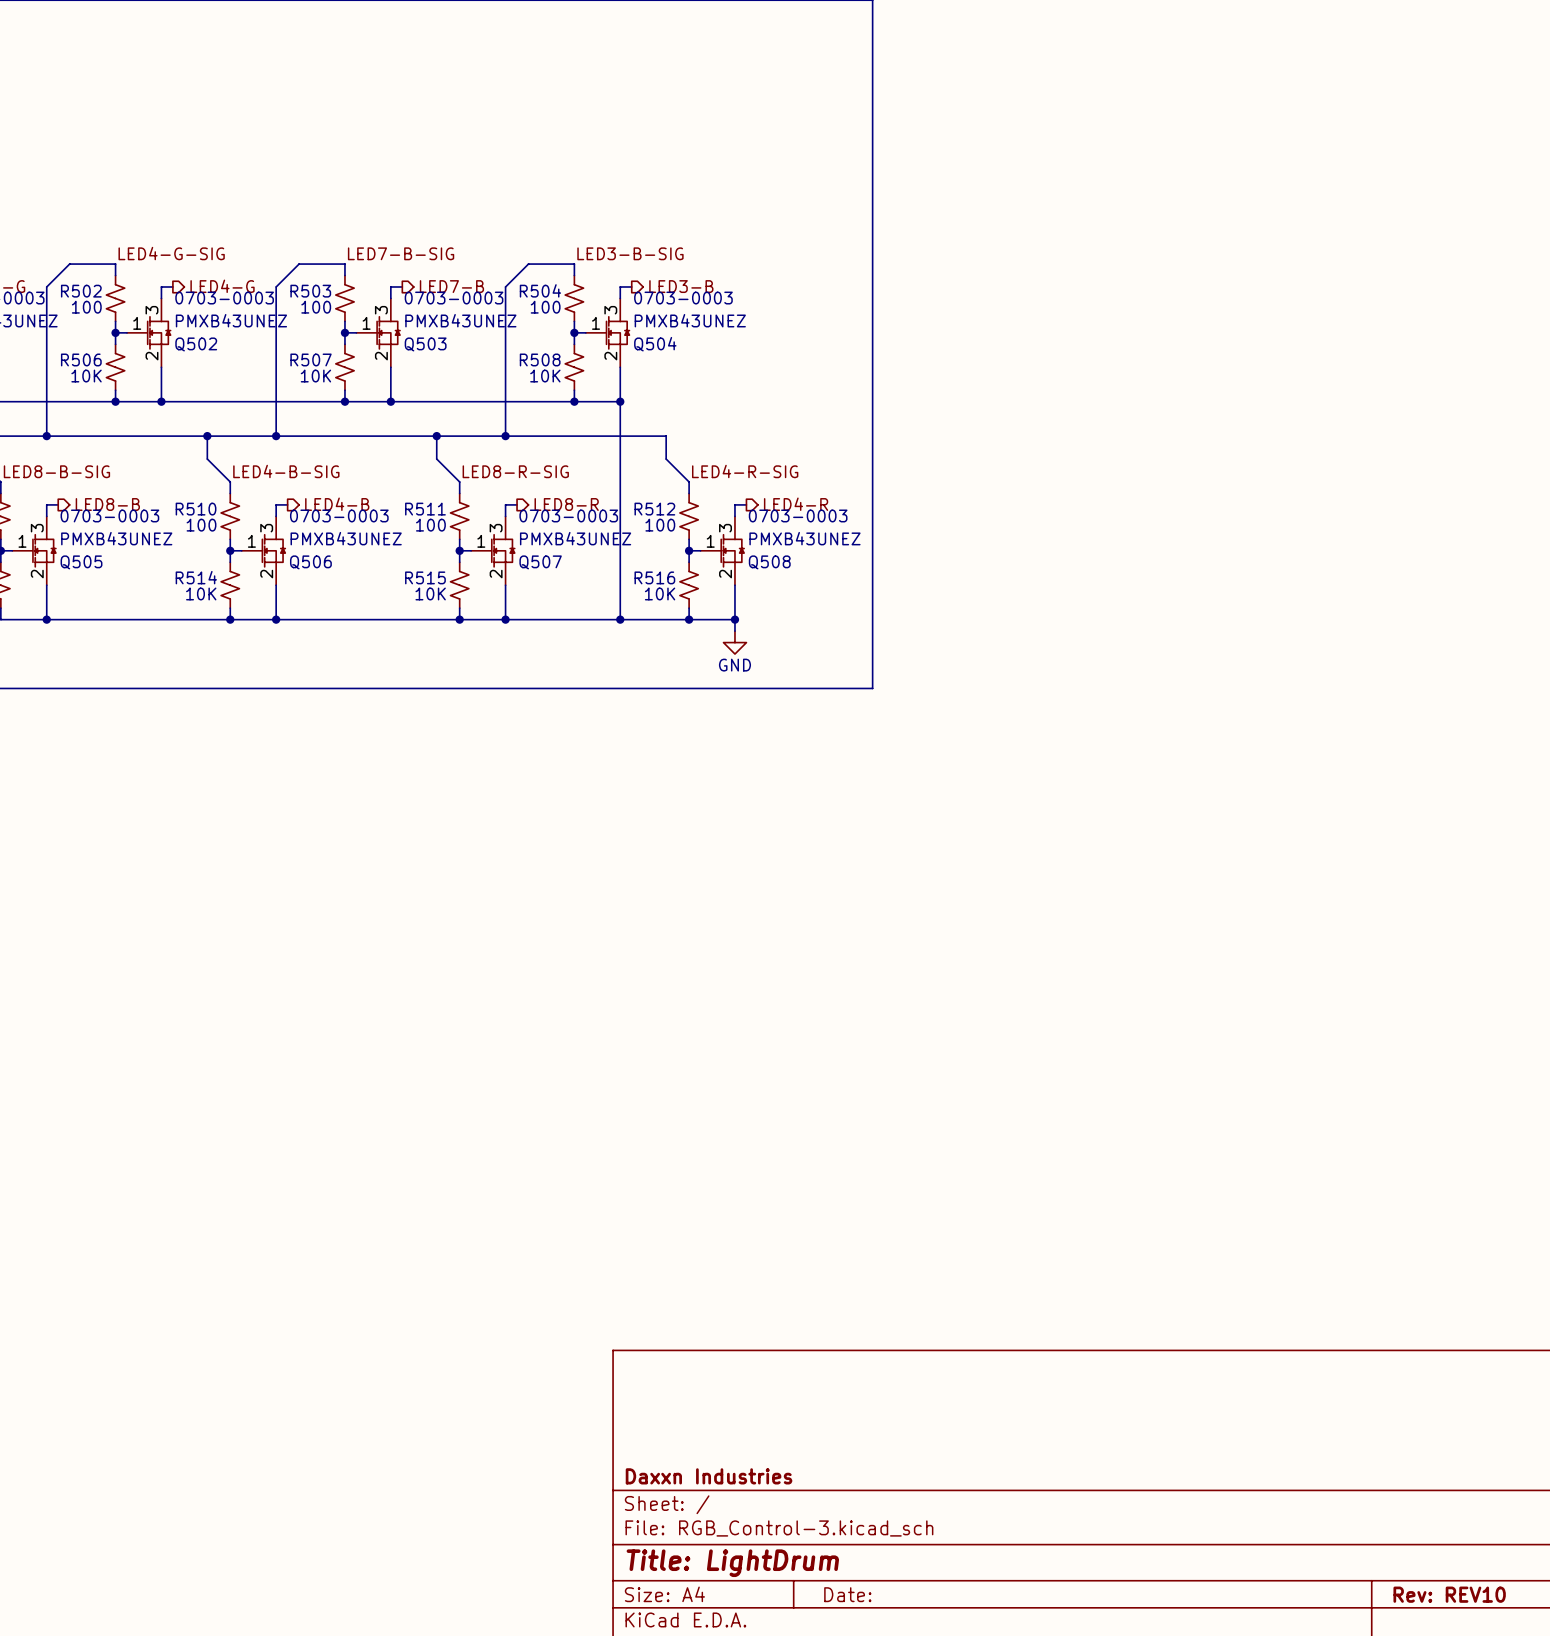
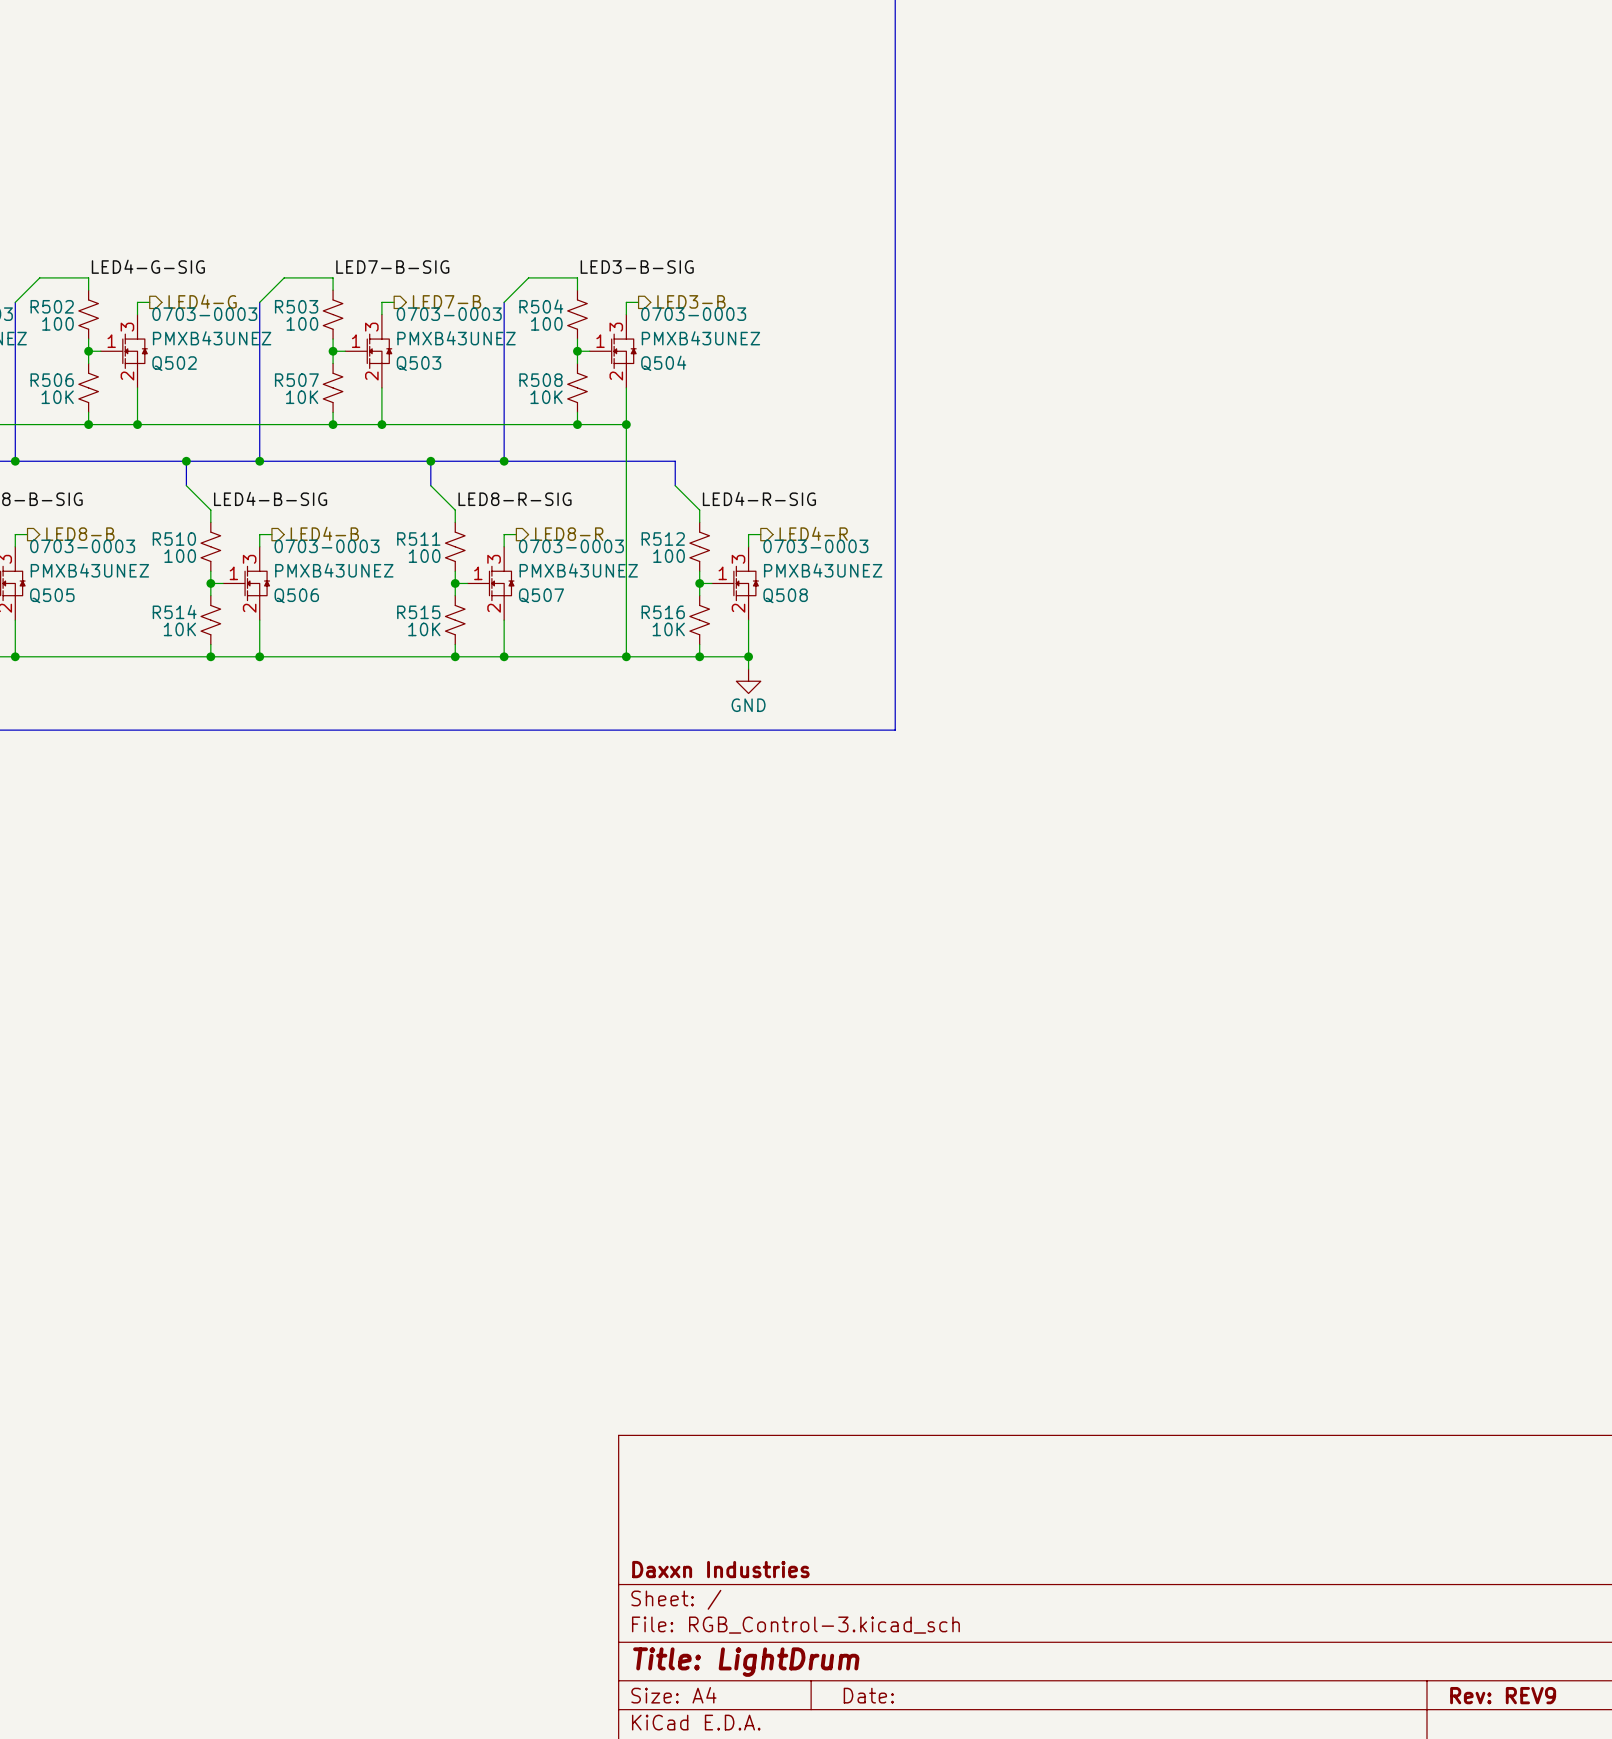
title block: Rev: REV10 (1449, 1594) -> Rev: REV9 (1503, 1695)

